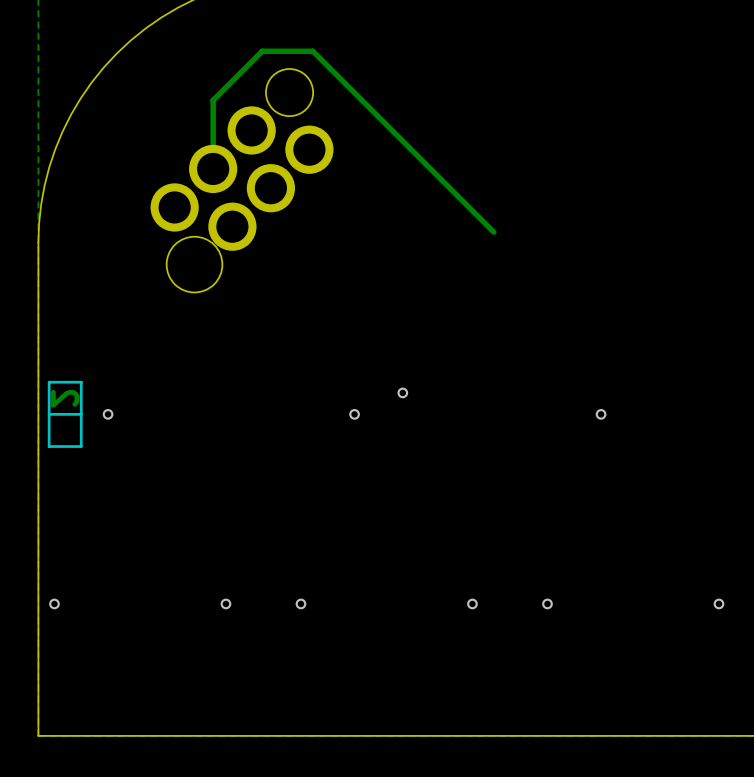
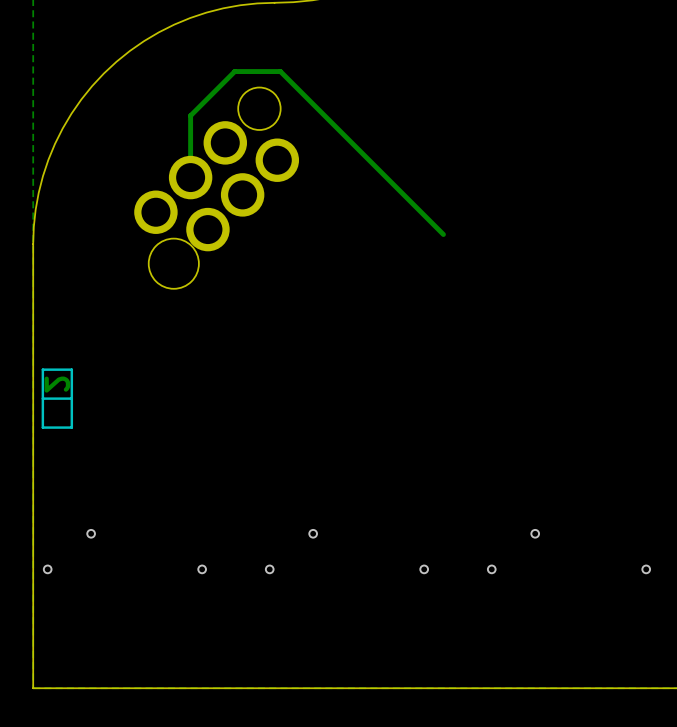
via: (402, 392) -> none
via: (108, 414) -> none
via: (354, 414) -> none
via: (601, 414) -> none
via: none -> (91, 533)
via: none -> (313, 533)
via: none -> (535, 533)

